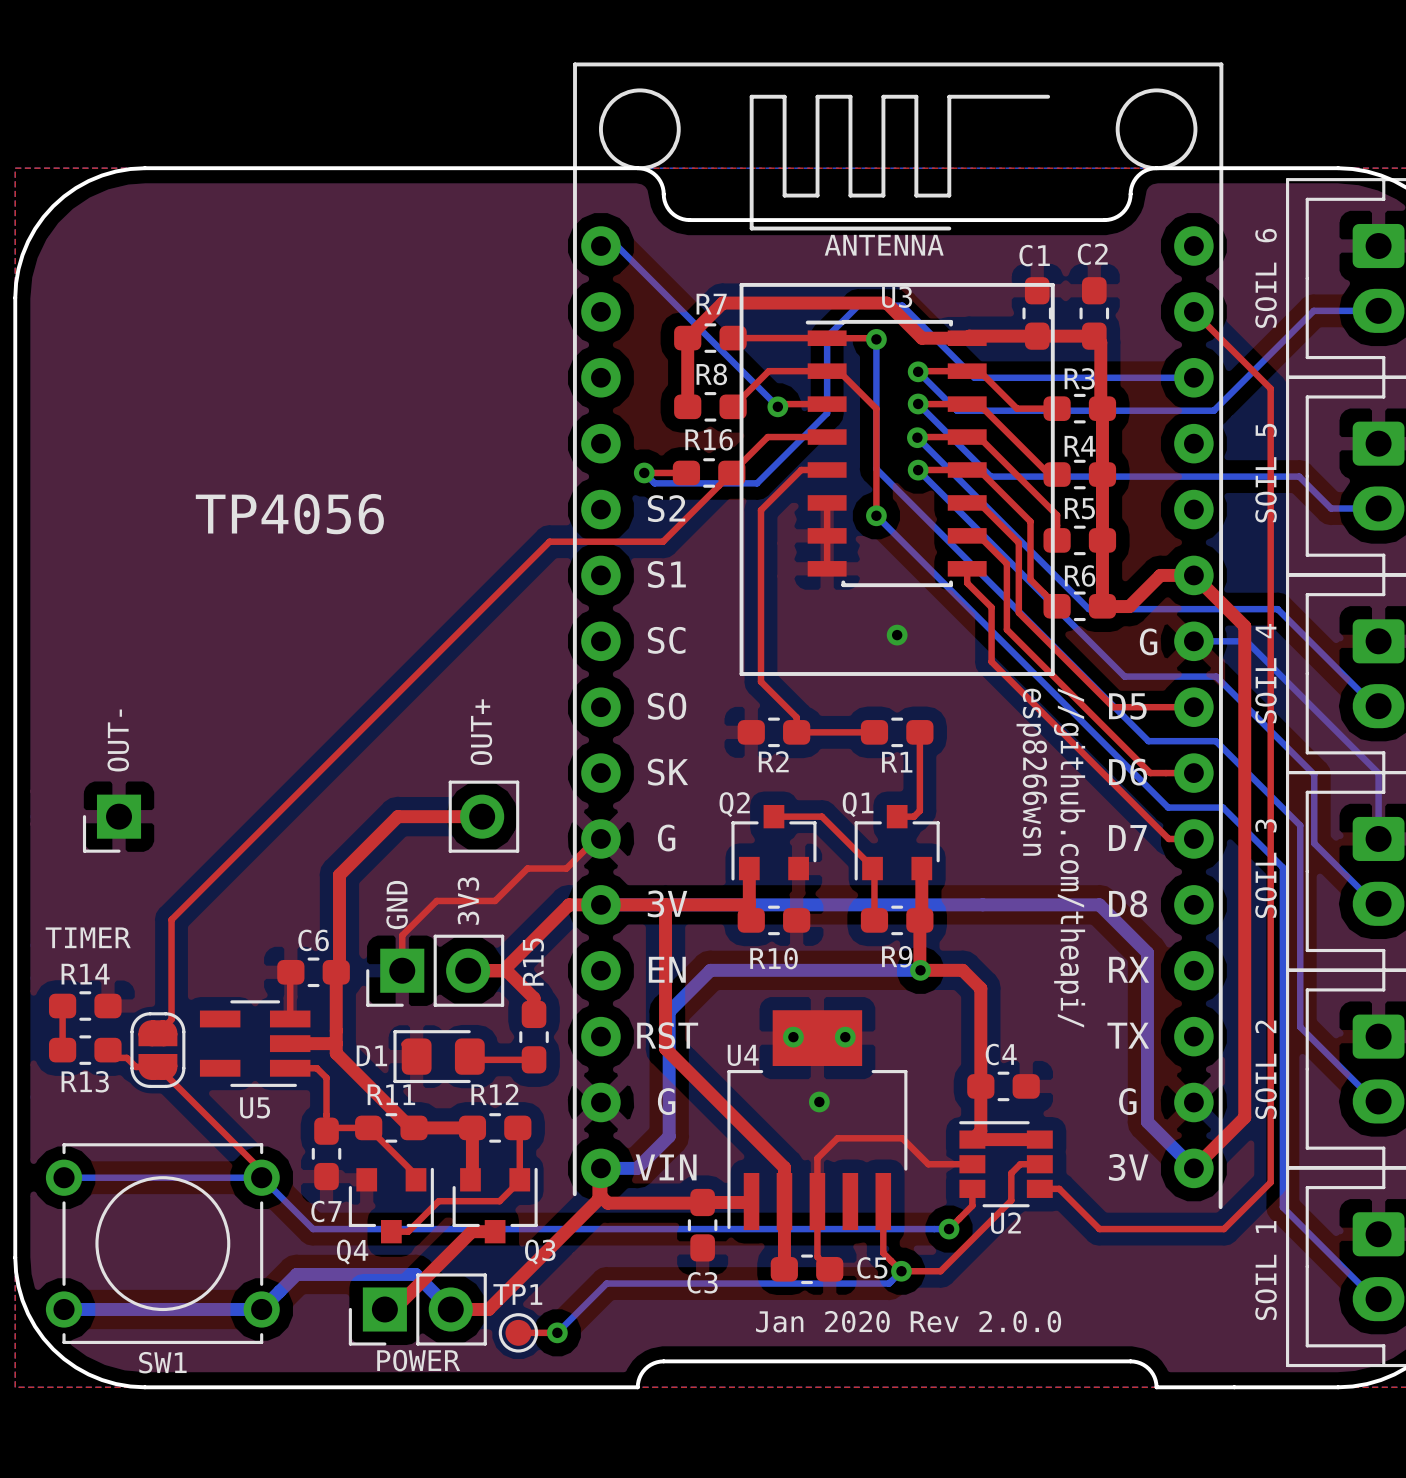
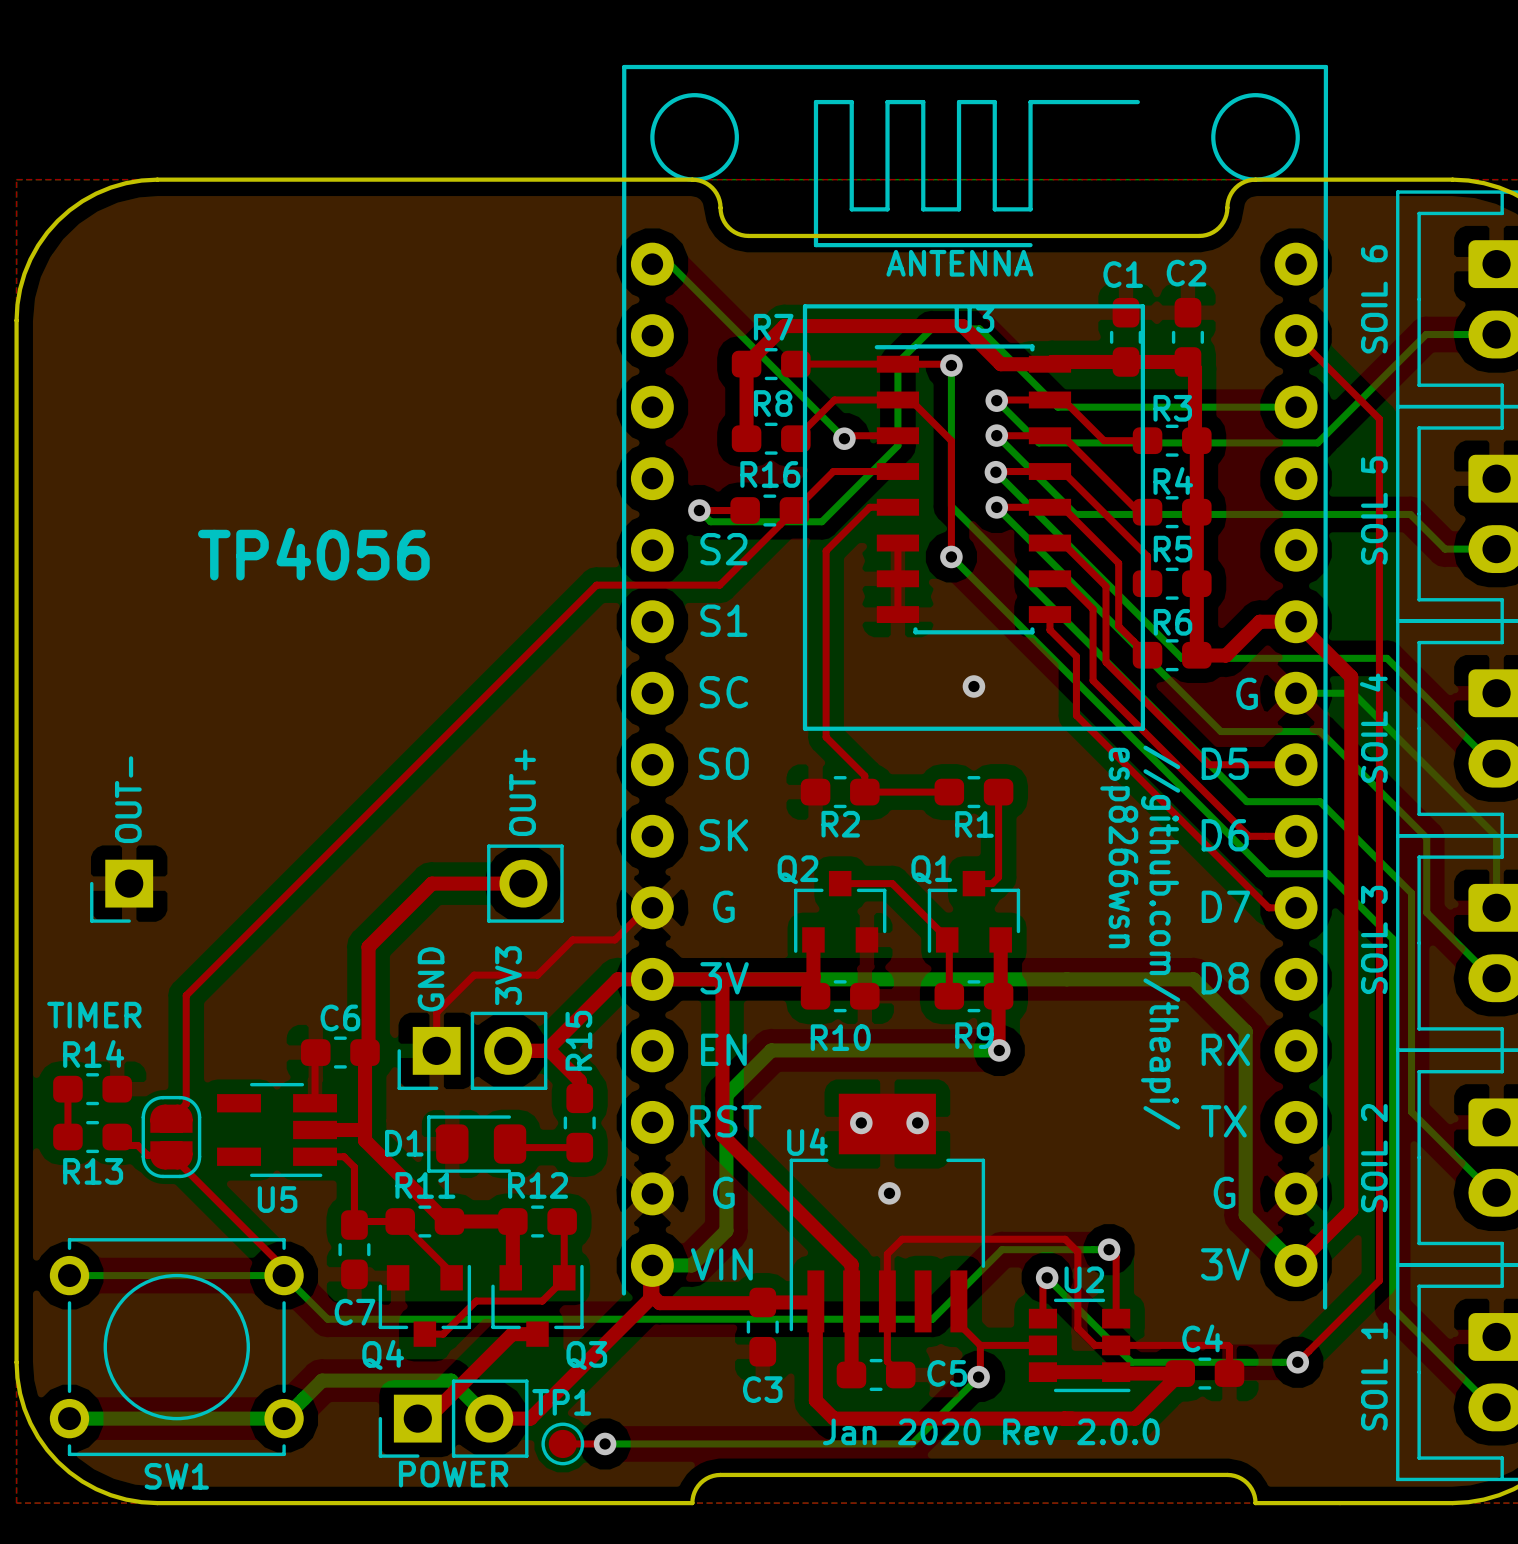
top track: (920, 970) (962, 970) (980, 988) (980, 1131) (972, 1139) (1039, 1139) -> none
C4 position: (1003, 1086) -> (1204, 1373)
top track: none -> (1104, 1244) (1116, 1256) (1116, 1318) (1114, 1317)
via: none -> (1109, 1249)
top track: (817, 1158) (837, 1138) (902, 1138) (928, 1164) (972, 1164) -> (887, 1254) (902, 1239) (1065, 1239) (1077, 1251) (1077, 1328) (1095, 1345) (1227, 1345) (1229, 1373)
U2 rotation: 0° (1005, 1164) -> 180° (1079, 1345)
U2 position: (1005, 1164) -> (1079, 1345)
top track: (1039, 1164) (1020, 1164) (1011, 1173) (1011, 1200) (940, 1271) (901, 1271) (883, 1253) (883, 1222) -> (980, 1345) (958, 1323)
top track: none -> (1047, 1277) (1042, 1282) (1042, 1318)
bottom track: none -> (1047, 1277) (1131, 1362) (1297, 1362)
top track: (972, 1188) (972, 1205) (949, 1229) -> none
top track: (1039, 1188) (1059, 1188) (1099, 1229) (1224, 1229) -> (1297, 1362) (1328, 1331)
top track: none -> (815, 1301) (815, 1400) (833, 1418) (1135, 1418) (1180, 1373) (1042, 1372)
bottom track: (301, 1217) (313, 1229) (949, 1229) -> (327, 1319) (932, 1319) (1002, 1249) (1109, 1249)
via position: (949, 1229) -> (1047, 1277)
top track: none -> (980, 1345) (1042, 1345)
top track: none -> (980, 1345) (979, 1376)
via: none -> (1297, 1362)
bottom track: (901, 1271) (889, 1283) (606, 1283) (557, 1332) -> (979, 1376) (912, 1443) (605, 1443)

